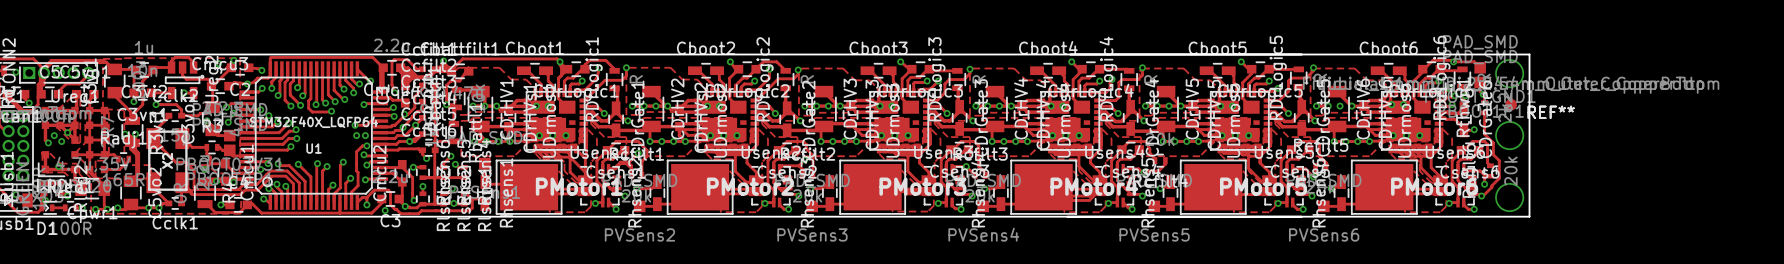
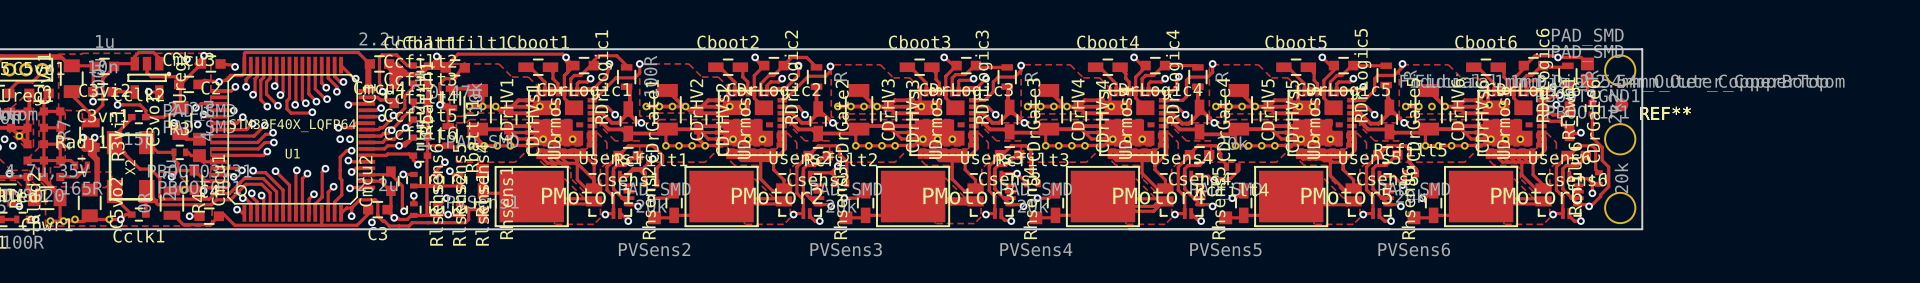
RDrLogic1 value: R (636, 79) -> 100R (650, 75)

